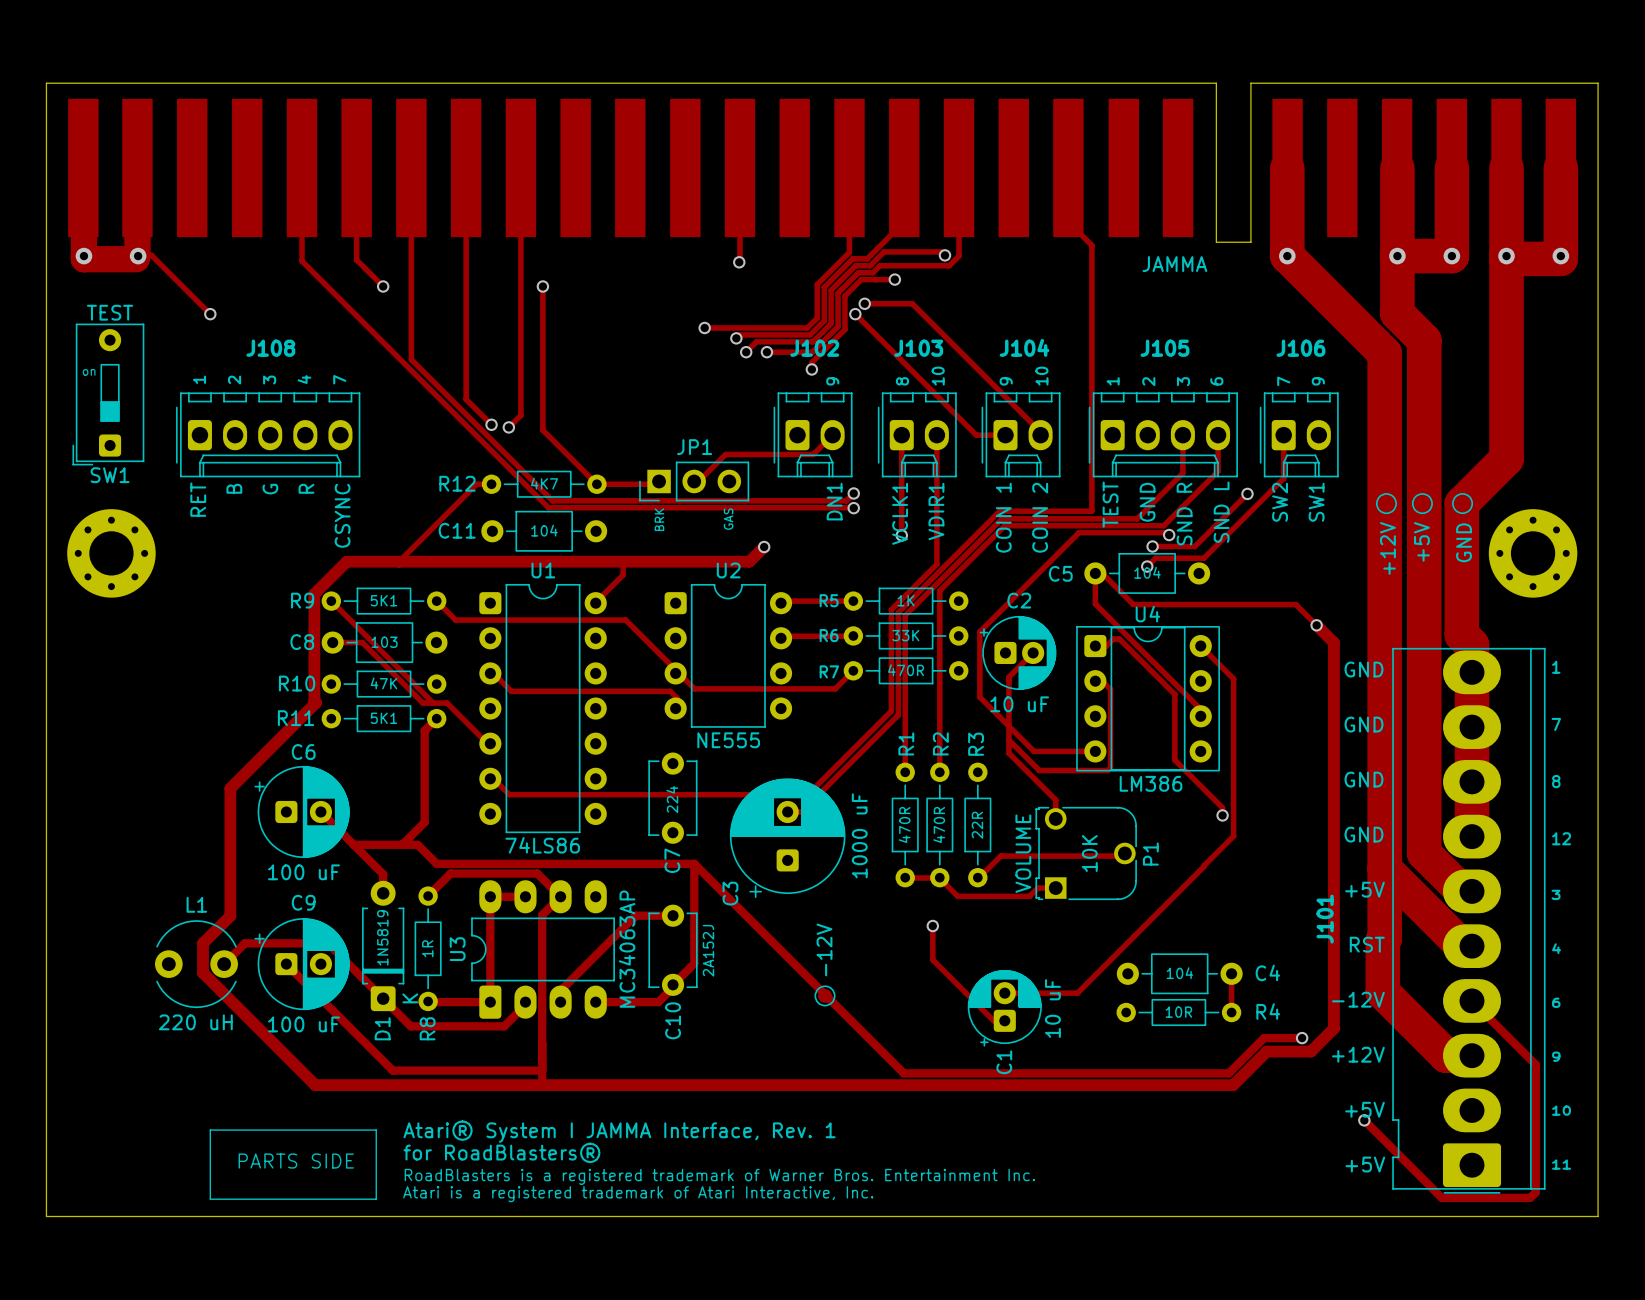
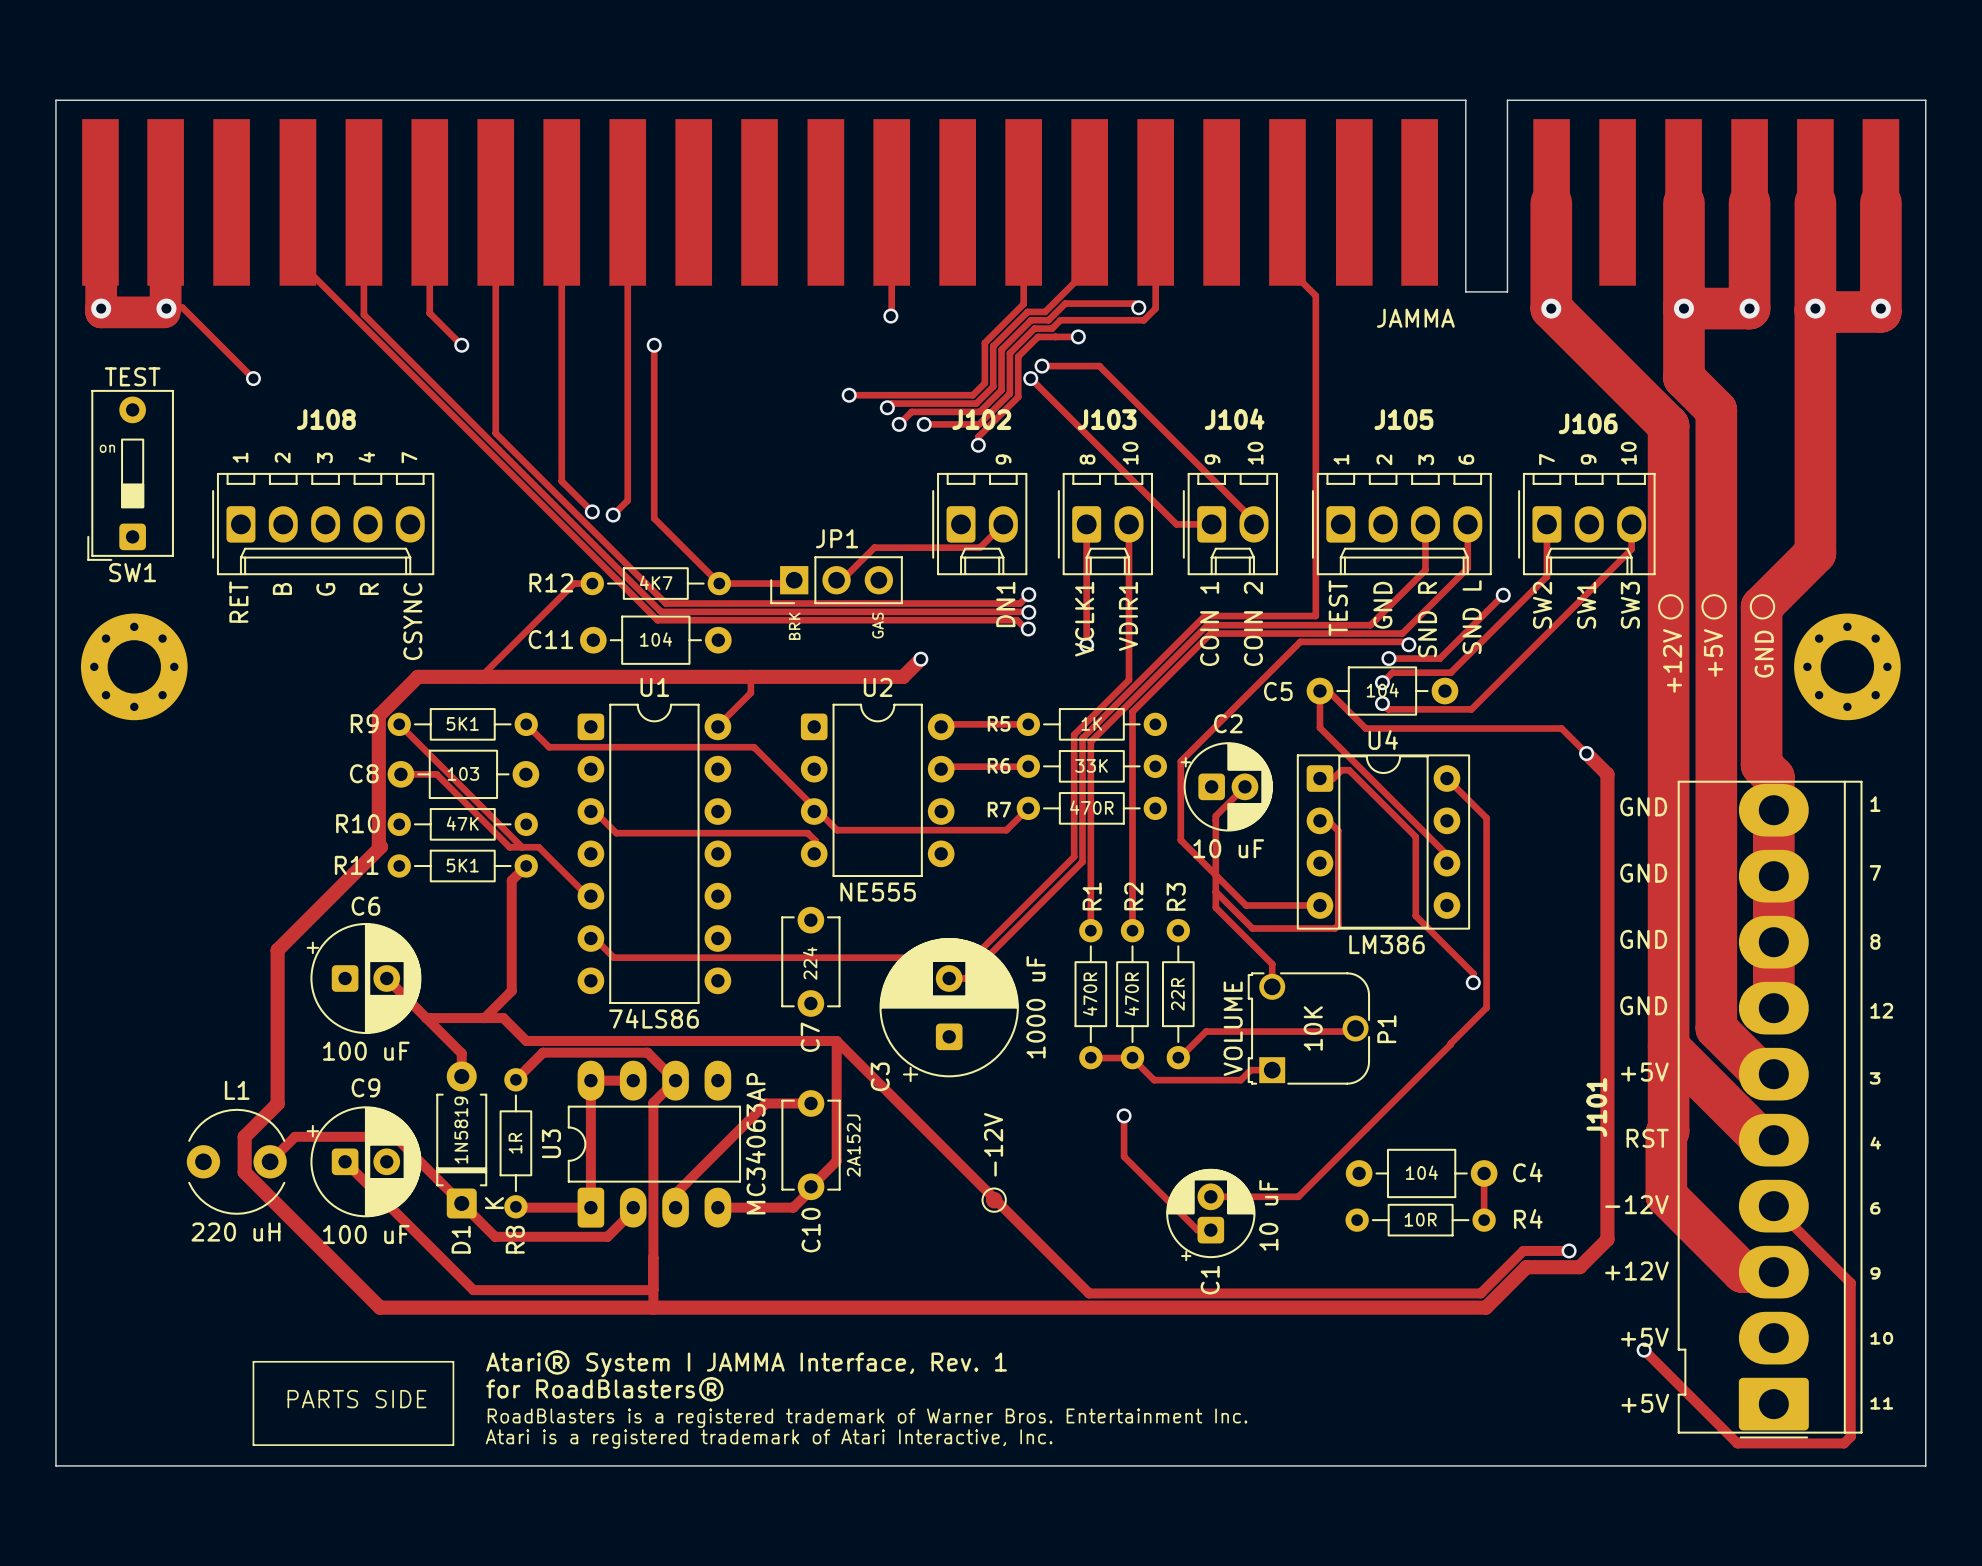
track: none -> (297, 202) (297, 260) (657, 620) (1017, 620) (1025, 629) (1028, 629)
text: none -> 10 (1628, 453)
J106 footprint: [1259, 392, 1339, 478] -> [1518, 472, 1656, 576]
track: none -> (1631, 524) (1631, 549) (1471, 709) (1388, 709) (1382, 703)
text: none -> SW3 (1630, 605)
via: none -> (1028, 629)
via: none -> (1382, 703)

